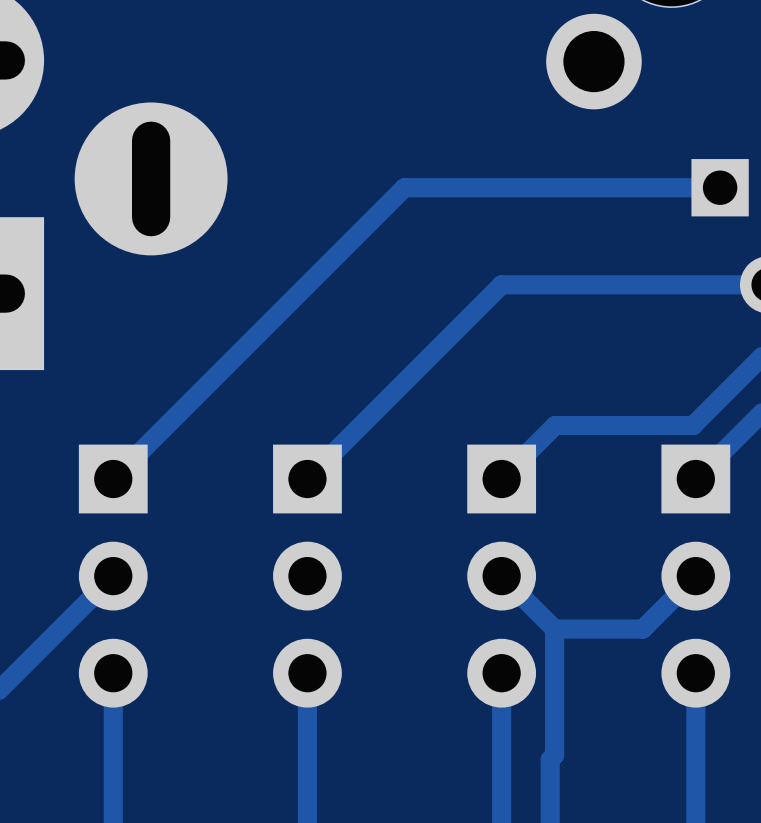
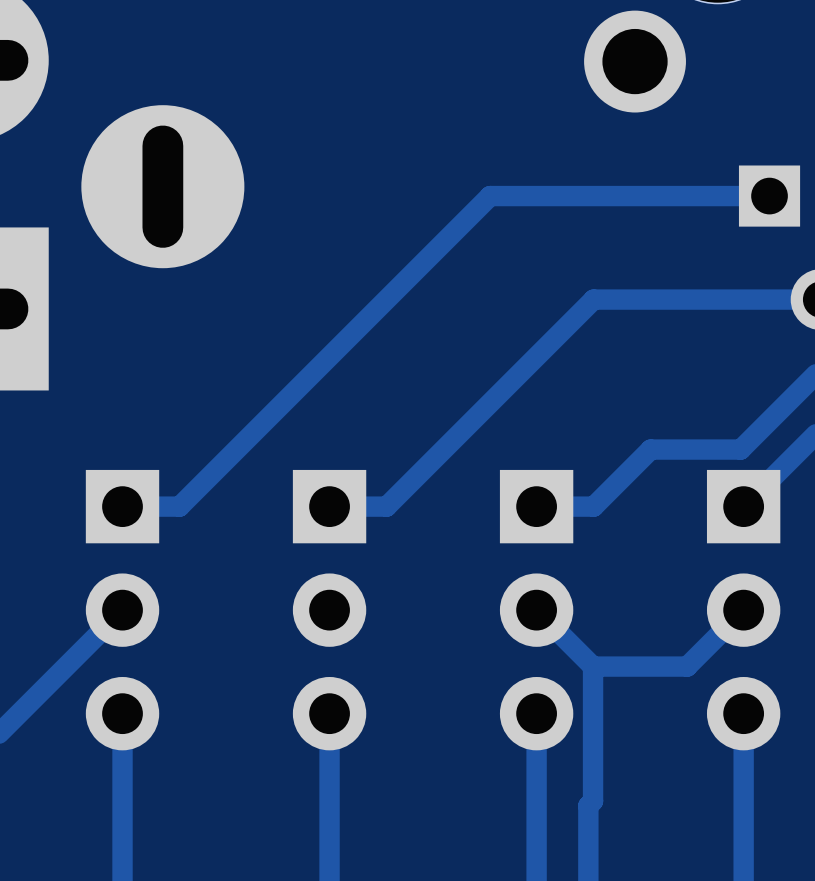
track: (458, 187) (404, 187) (113, 479) -> (490, 196) (179, 506) (122, 506)
track: (555, 284) (501, 284) (307, 479) -> (593, 299) (386, 506) (329, 506)
track: (608, 425) (555, 425) (501, 479) -> (650, 449) (593, 506) (536, 506)

